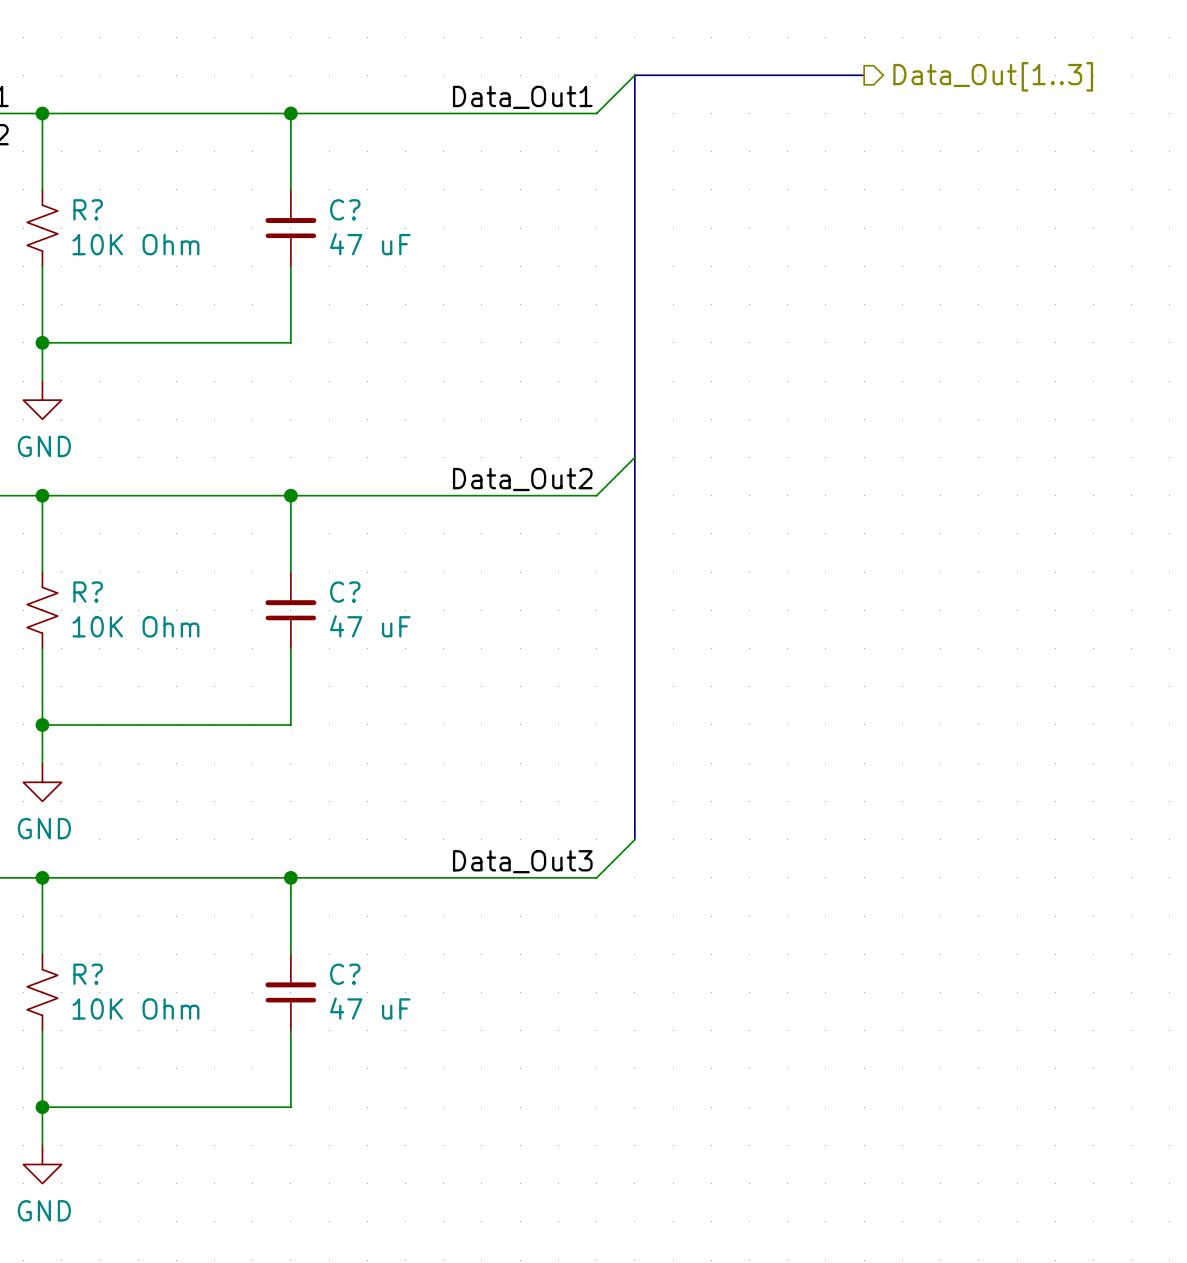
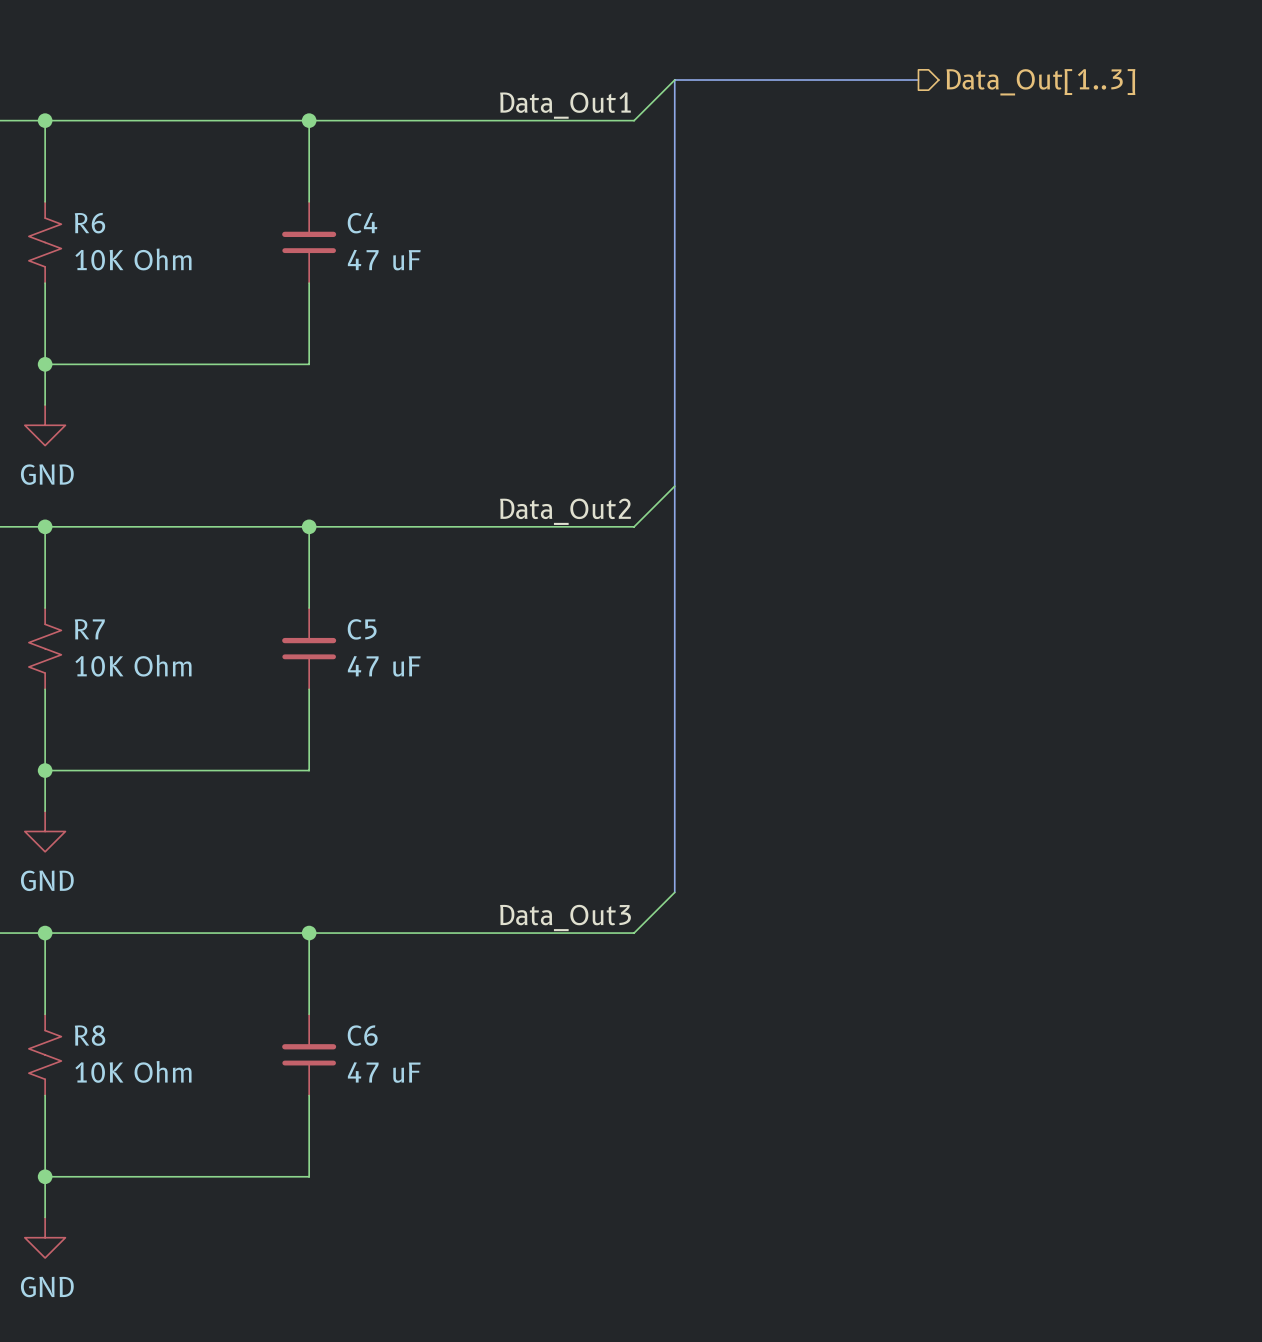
R? name: R? (88, 209) -> R6 (90, 223)
C? name: C? (345, 209) -> C4 (362, 223)
R? name: R? (88, 592) -> R7 (89, 629)
C? name: C? (345, 592) -> C5 (362, 629)
R? name: R? (88, 974) -> R8 (90, 1035)
C? name: C? (345, 974) -> C6 (362, 1035)

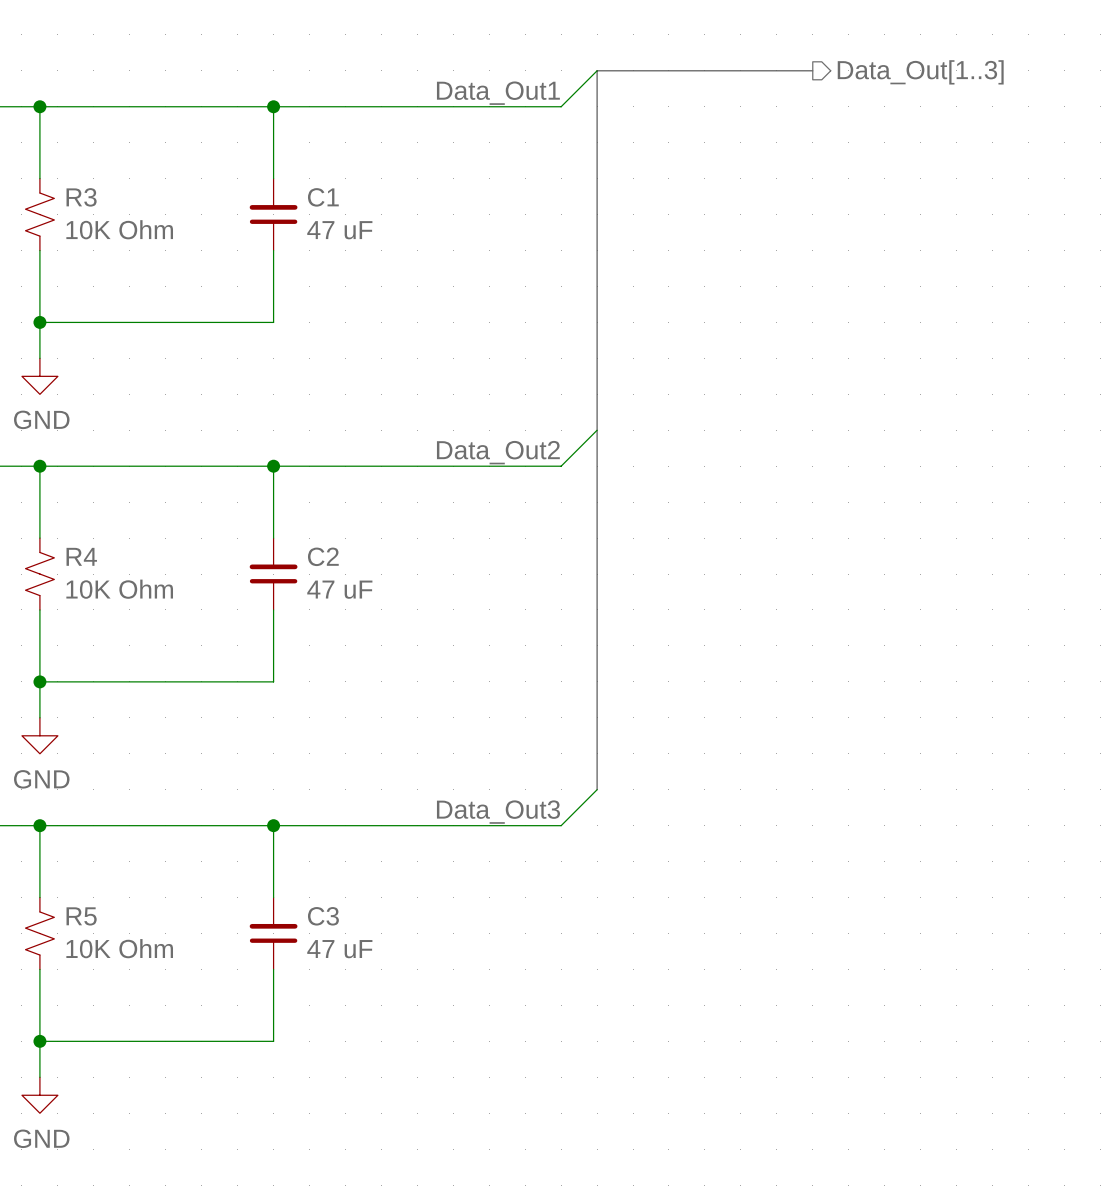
R6 name: R6 (90, 223) -> R3 (81, 197)
C4 name: C4 (362, 223) -> C1 (323, 197)
R7 name: R7 (89, 629) -> R4 (81, 556)
C5 name: C5 (362, 629) -> C2 (323, 556)
R8 name: R8 (90, 1035) -> R5 (81, 916)
C6 name: C6 (362, 1035) -> C3 (323, 916)

